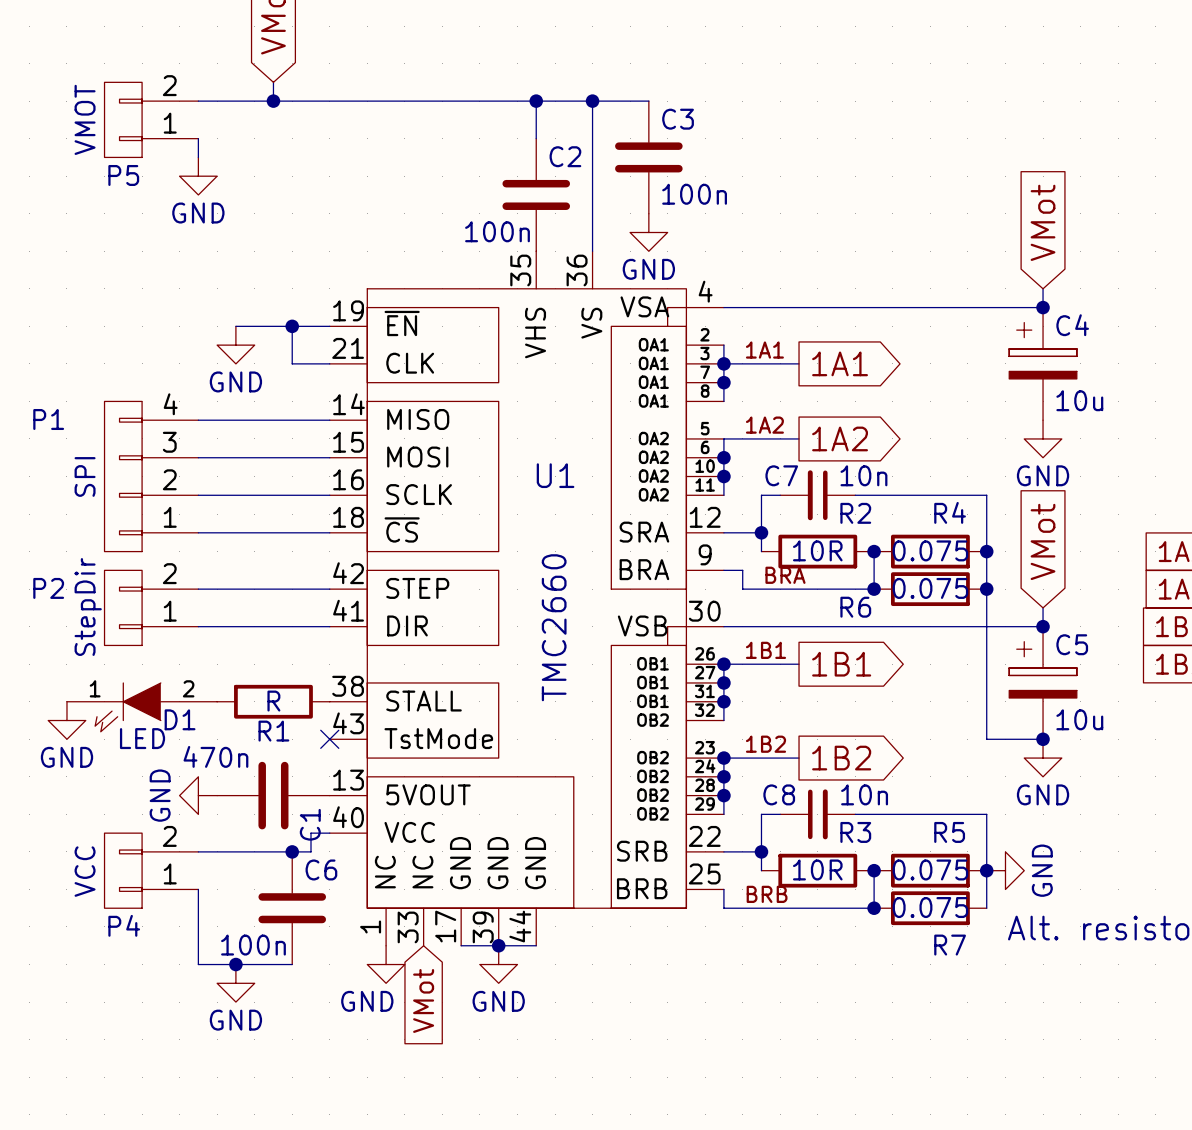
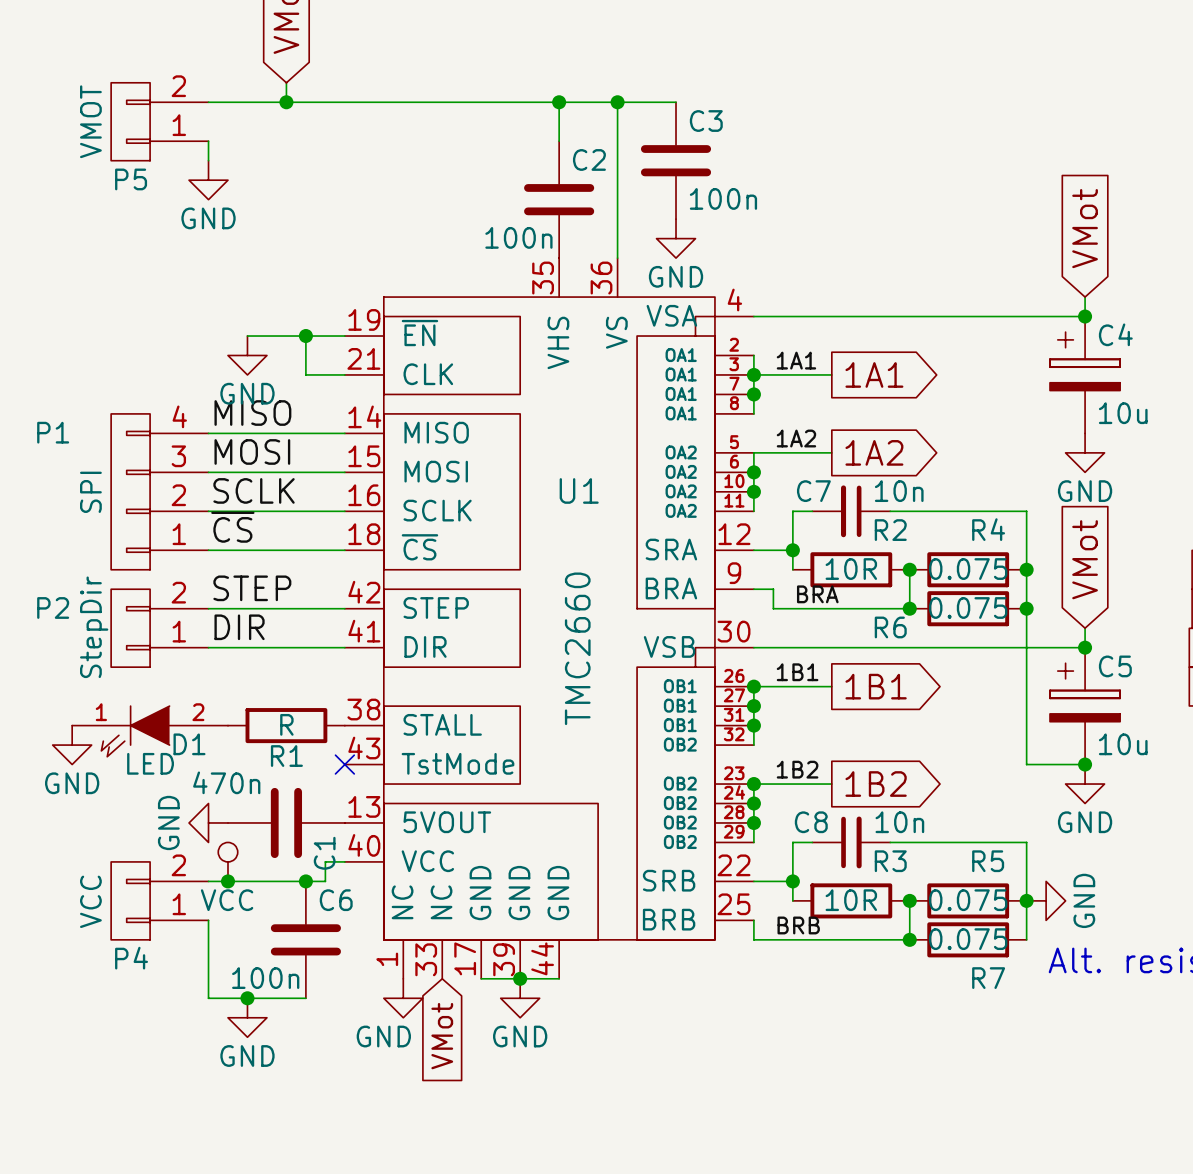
label: none -> MISO (252, 413)
label: none -> MOSI (252, 451)
label: none -> SCLK (254, 490)
label: none -> ~{CS} (232, 527)
label: none -> STEP (252, 588)
label: none -> DIR (239, 627)
power symbol: none -> VCC (227, 861)
junction: none -> (227, 881)

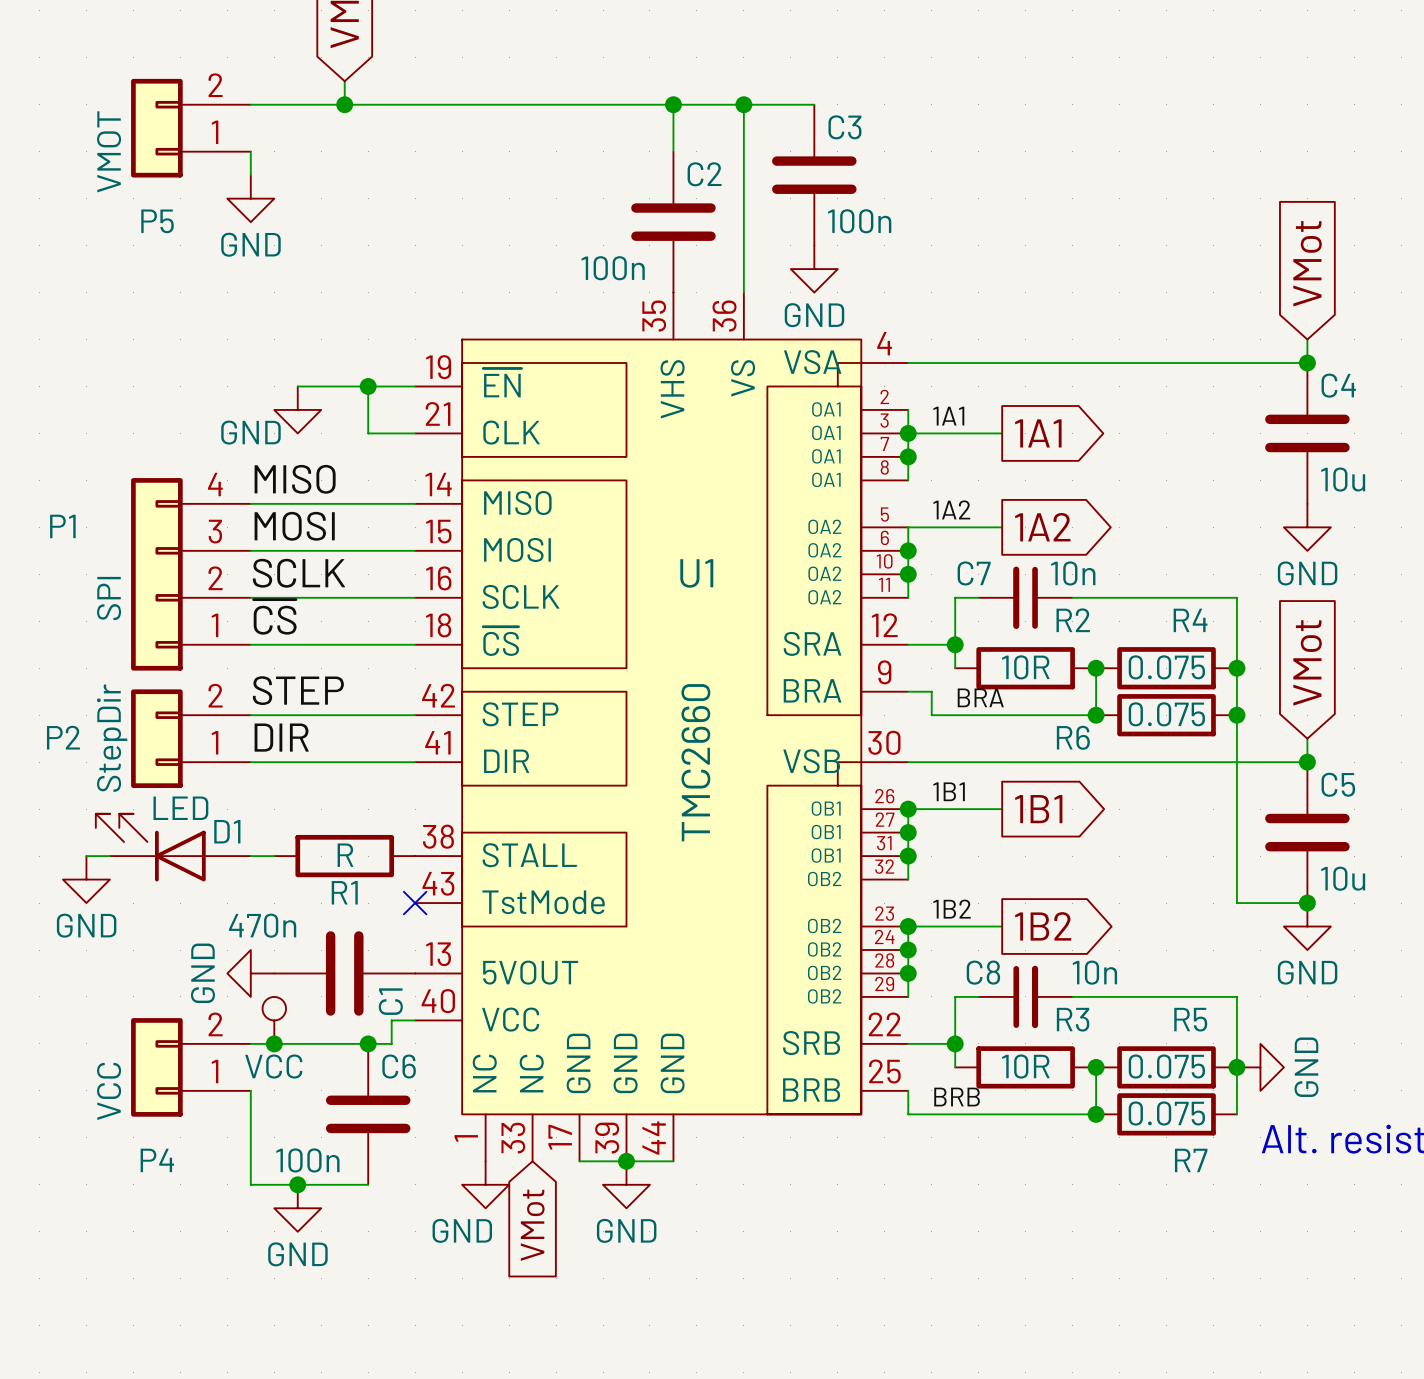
P5 symbol: [111, 82, 209, 161] -> [131, 78, 251, 178]
U1 symbol: [344, 258, 754, 979] -> [415, 292, 909, 1162]
C4 symbol: [1050, 316, 1121, 434] -> [1265, 363, 1350, 504]
power symbol text position: GND (247, 393) -> GND (250, 432)
P1 symbol: [111, 413, 209, 570] -> [131, 478, 251, 671]
P2 symbol: [111, 589, 209, 668] -> [131, 689, 251, 788]
C5 symbol: [1050, 647, 1121, 765] -> [1265, 762, 1350, 904]
D1 symbol: [72, 706, 228, 757] -> [95, 813, 251, 882]
D1 value position: LED (150, 763) -> LED (180, 808)
P4 symbol: [111, 861, 209, 940] -> [131, 1018, 251, 1117]

